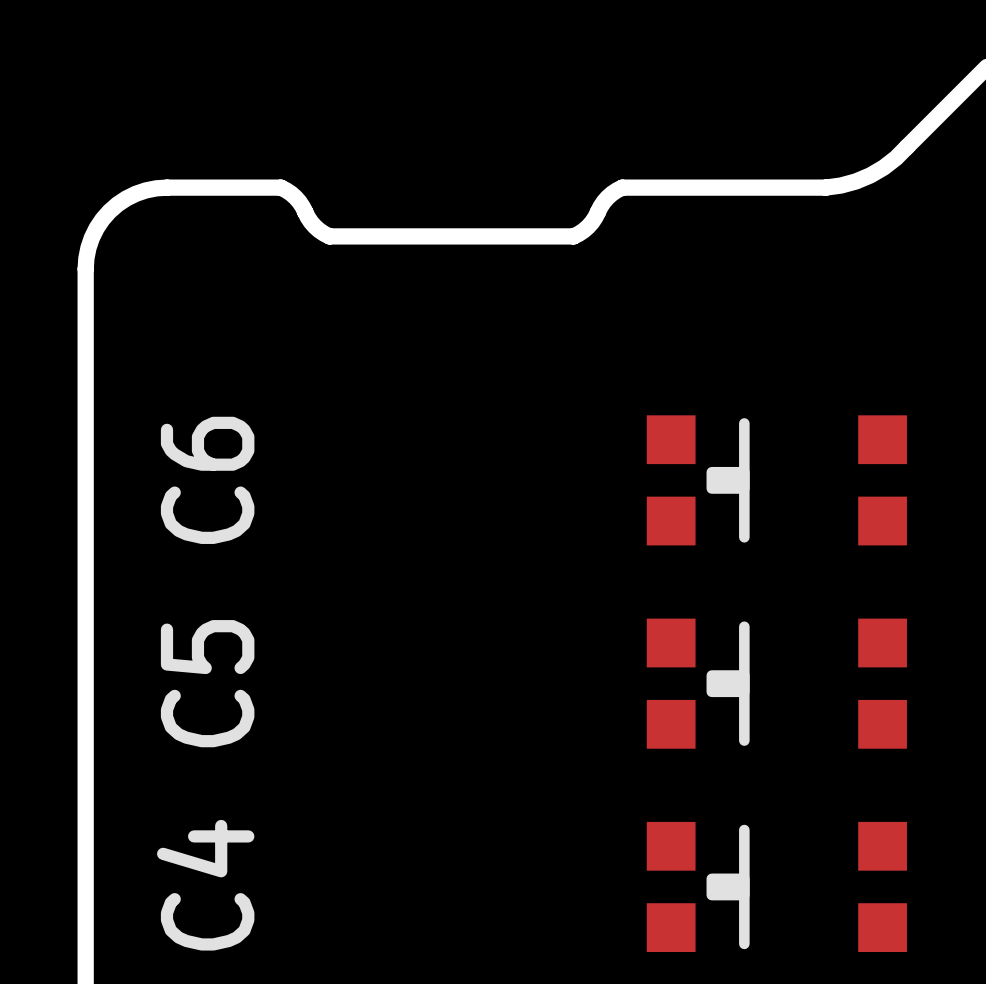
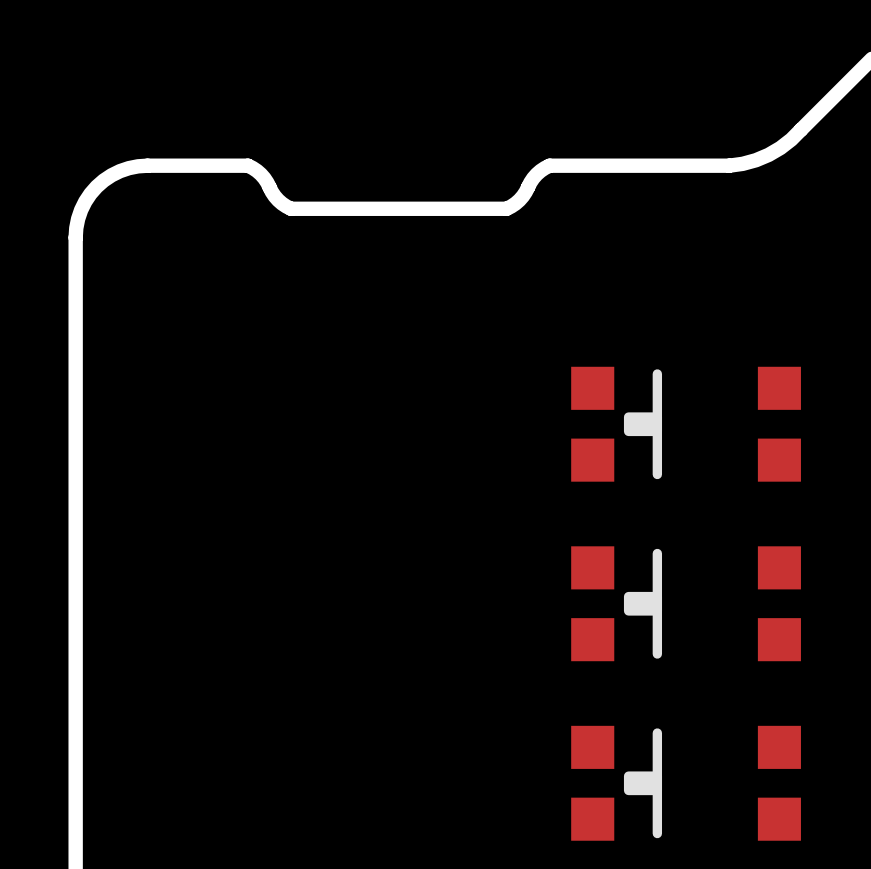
text: C6 (207, 480) -> none
text: C5 (207, 683) -> none
text: C4 (205, 885) -> none

